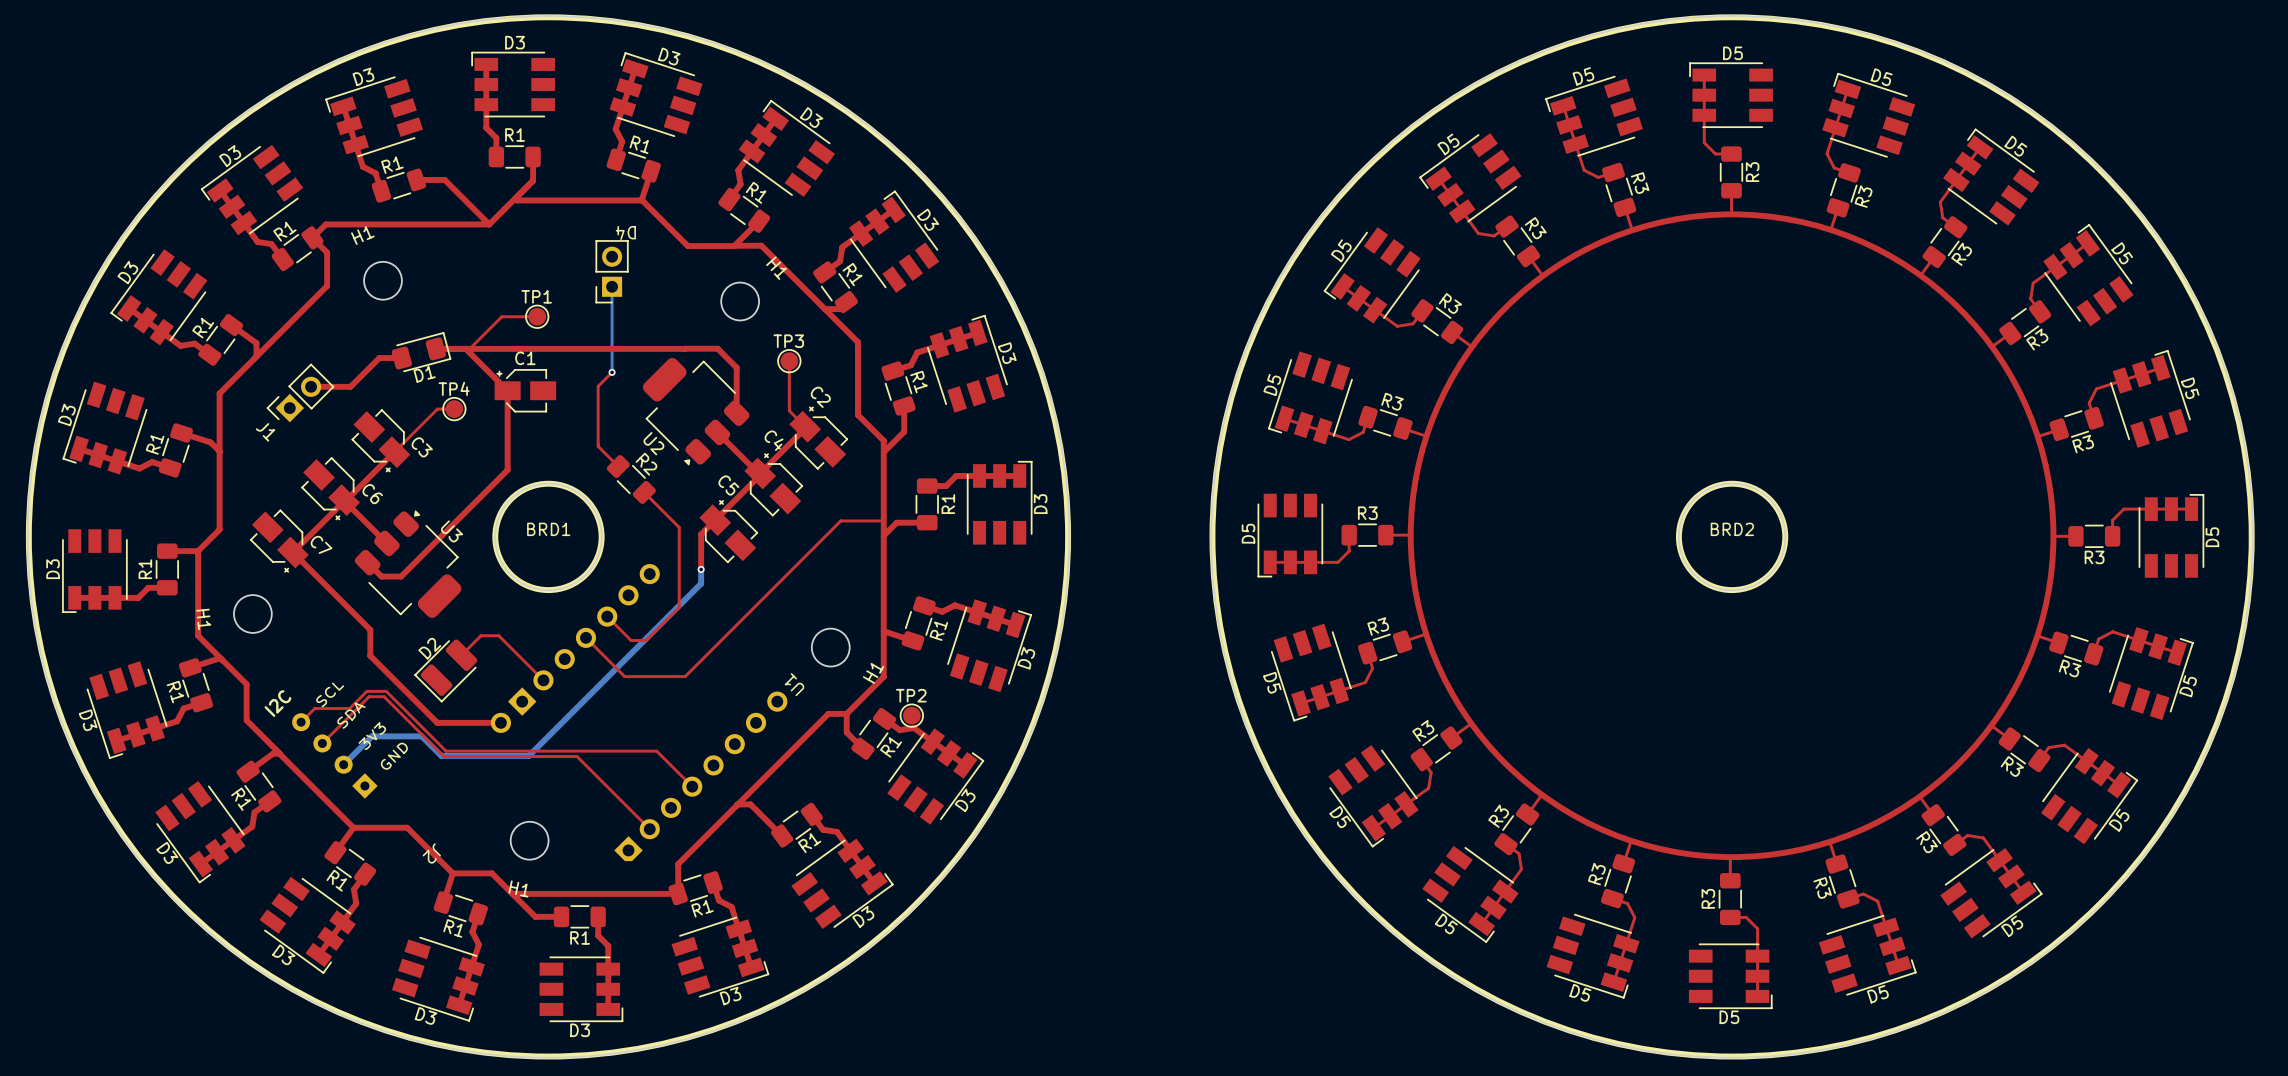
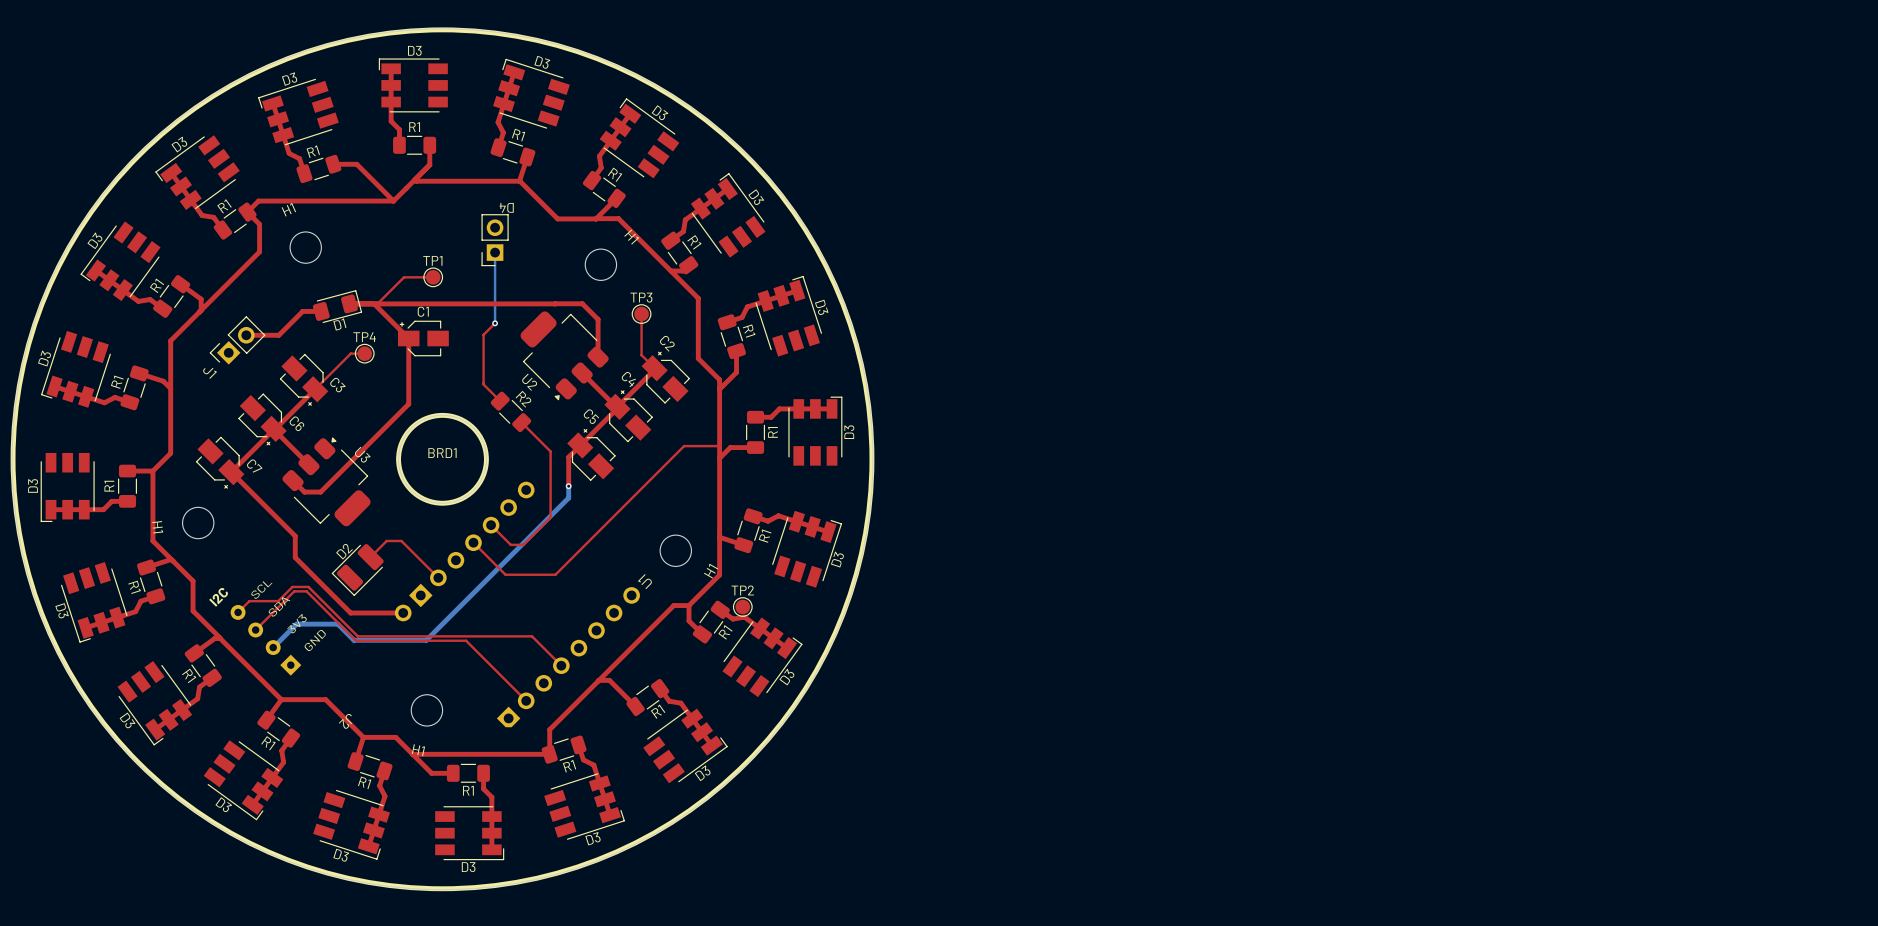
top track: (1704, 75) (1704, 142) (1715, 154) (1731, 154) -> none
top track: (1847, 89) (1827, 153) (1834, 167) (1849, 172) -> none
D5: (1731, 95) -> none
top track: (1563, 105) (1584, 170) (1598, 177) (1613, 172) -> none
D5: (1868, 115) -> none
D5: (1594, 116) -> none
top track: (1980, 147) (1940, 202) (1942, 217) (1955, 227) -> none
R3: (1731, 172) -> none
D5: (1991, 177) -> none
top track: (1438, 178) (1478, 233) (1494, 235) (1507, 226) -> none
D5: (1470, 178) -> none
R3: (1619, 189) -> none
top track: (1731, 190) (1731, 214) -> none
R3: (1843, 190) -> none
top track: (1624, 207) (1632, 229) -> none
top track: (1838, 207) (1830, 230) -> none
drawing: [1407, 211, 2057, 861] -> none
R3: (1517, 241) -> none
R3: (1944, 242) -> none
top track: (2087, 243) (2033, 283) (2030, 298) (2040, 311) -> none
top track: (1528, 256) (1542, 275) -> none
top track: (1934, 256) (1920, 276) -> none
D5: (1372, 275) -> none
D5: (2088, 275) -> none
top track: (1342, 286) (1397, 326) (1413, 323) (1422, 310) -> none
R3: (1437, 321) -> none
R3: (2025, 322) -> none
top track: (1452, 332) (1471, 346) -> none
top track: (2010, 333) (1991, 347) -> none
top track: (2160, 368) (2096, 388) (2089, 403) (2094, 418) -> none
D5: (1310, 397) -> none
D5: (2150, 398) -> none
top track: (1368, 417) (1363, 432) (1348, 439) (1284, 418) -> none
R3: (1385, 422) -> none
R3: (2076, 424) -> none
top track: (1402, 428) (1425, 435) -> none
top track: (2059, 429) (2036, 436) -> none
top track: (2191, 509) (2123, 509) (2112, 520) (2112, 536) -> none
D5: (1290, 535) -> none
top track: (1349, 535) (1349, 551) (1337, 562) (1270, 562) -> none
R3: (1367, 535) -> none
top track: (1385, 535) (1409, 535) -> none
D5: (2171, 535) -> none
BRD2: (1732, 536) -> none
top track: (2052, 536) (2075, 536) -> none
R3: (2094, 536) -> none
top track: (1425, 634) (1402, 641) -> none
top track: (2036, 635) (2058, 642) -> none
R3: (1385, 647) -> none
R3: (2076, 648) -> none
top track: (2177, 652) (2112, 631) (2098, 639) (2093, 654) -> none
top track: (1367, 653) (1372, 668) (1365, 682) (1301, 703) -> none
D5: (1311, 672) -> none
D5: (2151, 673) -> none
top track: (1470, 724) (1451, 738) -> none
top track: (1990, 725) (2009, 739) -> none
R3: (1436, 748) -> none
R3: (2024, 749) -> none
top track: (1421, 759) (1431, 772) (1428, 788) (1373, 828) -> none
top track: (2039, 760) (2048, 747) (2064, 745) (2119, 784) -> none
top track: (1541, 795) (1527, 814) -> none
D5: (1373, 796) -> none
top track: (1919, 796) (1933, 815) -> none
D5: (2089, 796) -> none
R3: (1516, 829) -> none
R3: (1944, 830) -> none
top track: (1631, 841) (1623, 863) -> none
top track: (1829, 841) (1836, 864) -> none
top track: (1506, 844) (1518, 853) (1521, 869) (1481, 924) -> none
top track: (1954, 844) (1967, 835) (1983, 837) (2023, 892) -> none
top track: (1730, 857) (1730, 880) -> none
R3: (1618, 881) -> none
R3: (1842, 881) -> none
D5: (1991, 893) -> none
D5: (1470, 894) -> none
top track: (1612, 898) (1627, 903) (1634, 917) (1613, 982) -> none
top track: (1848, 898) (1863, 894) (1877, 901) (1898, 965) -> none
R3: (1730, 899) -> none
top track: (1730, 917) (1746, 917) (1757, 928) (1757, 996) -> none
D5: (1867, 955) -> none
D5: (1593, 956) -> none
D5: (1730, 976) -> none

